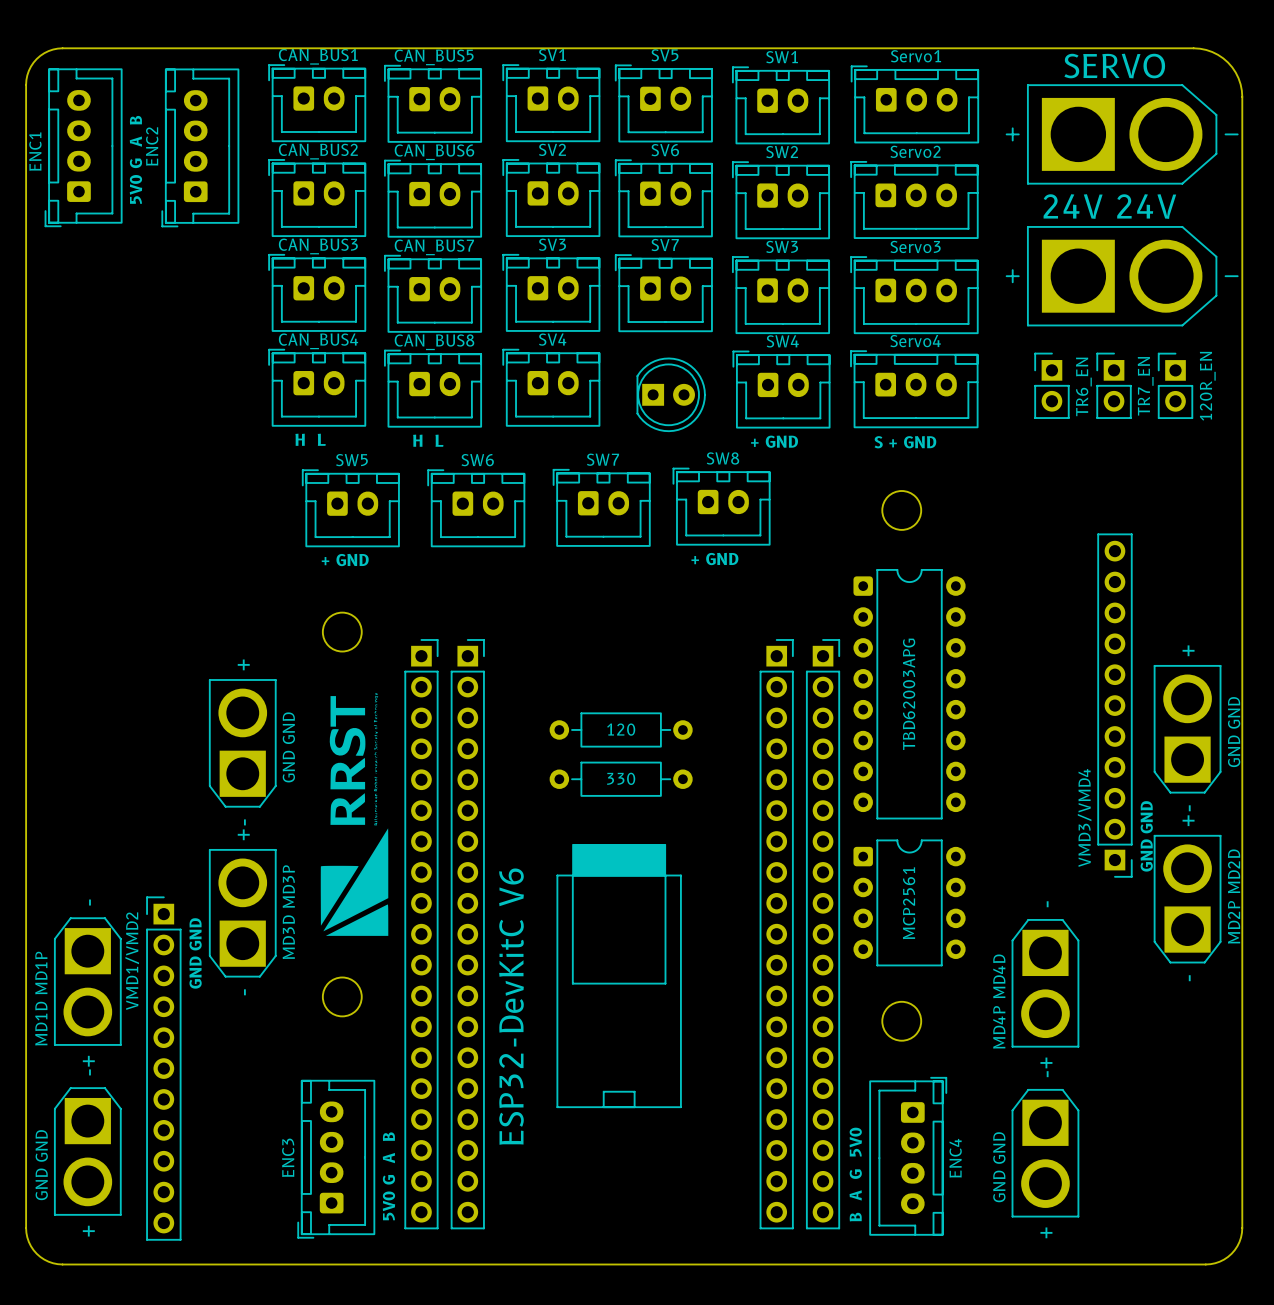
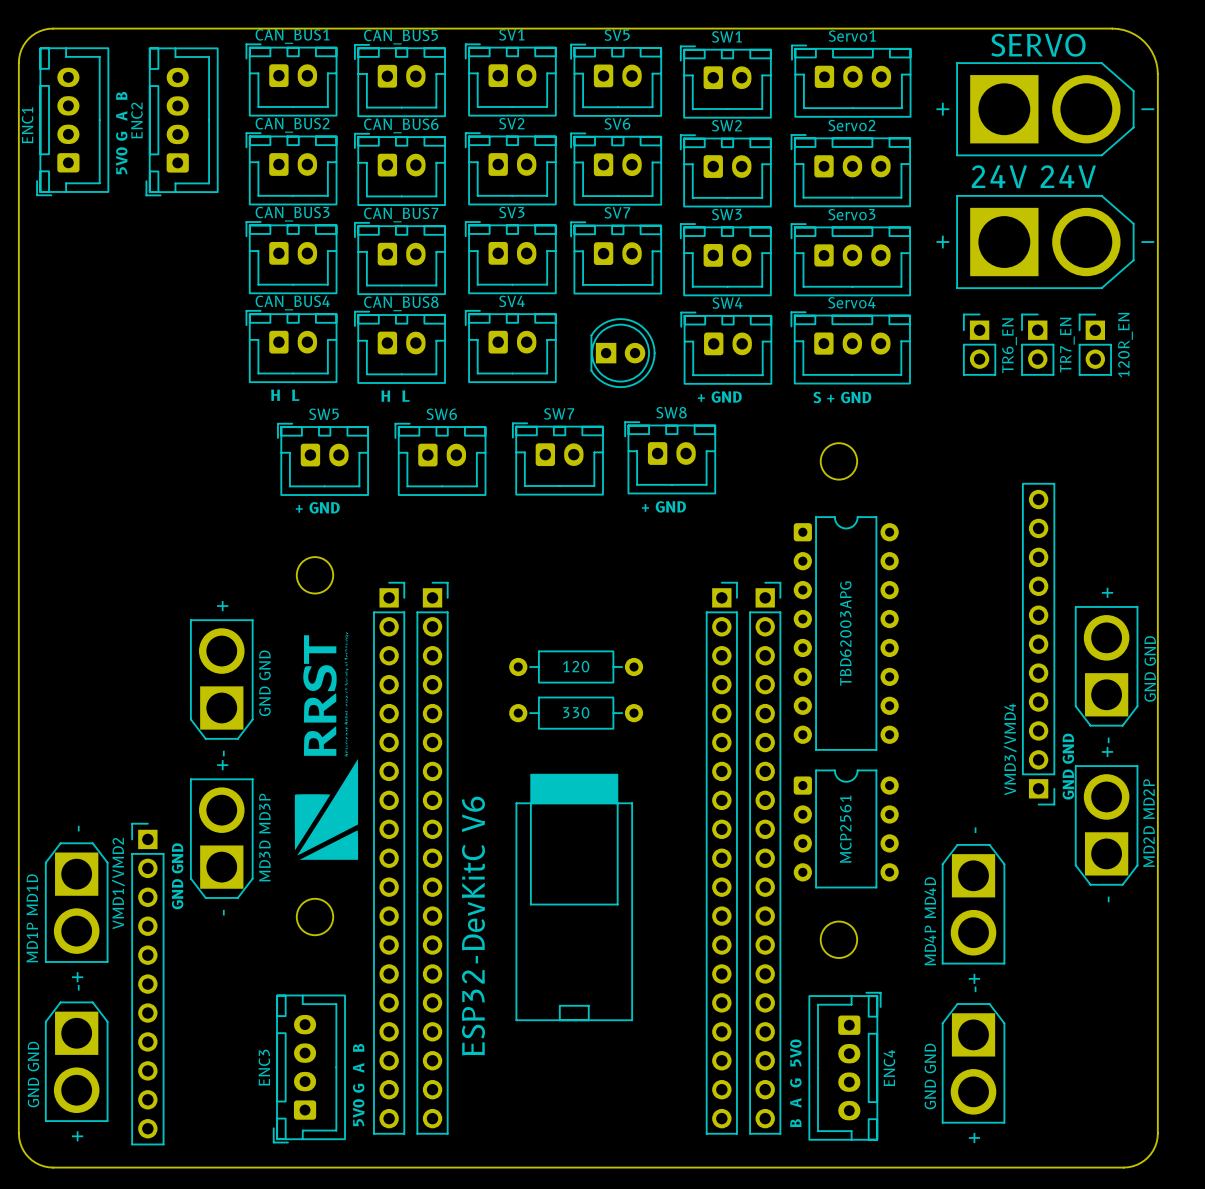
text: MD2P MD2D (1234, 896) -> MD2D MD2P (1149, 823)
text: MD1D MD1P (41, 998) -> MD1P MD1D (32, 918)

